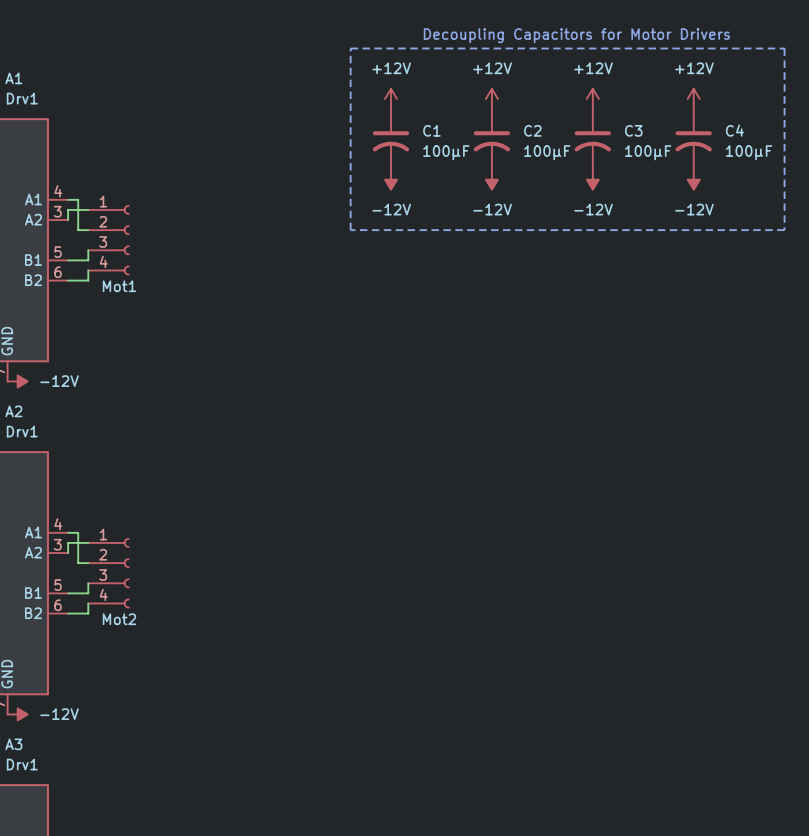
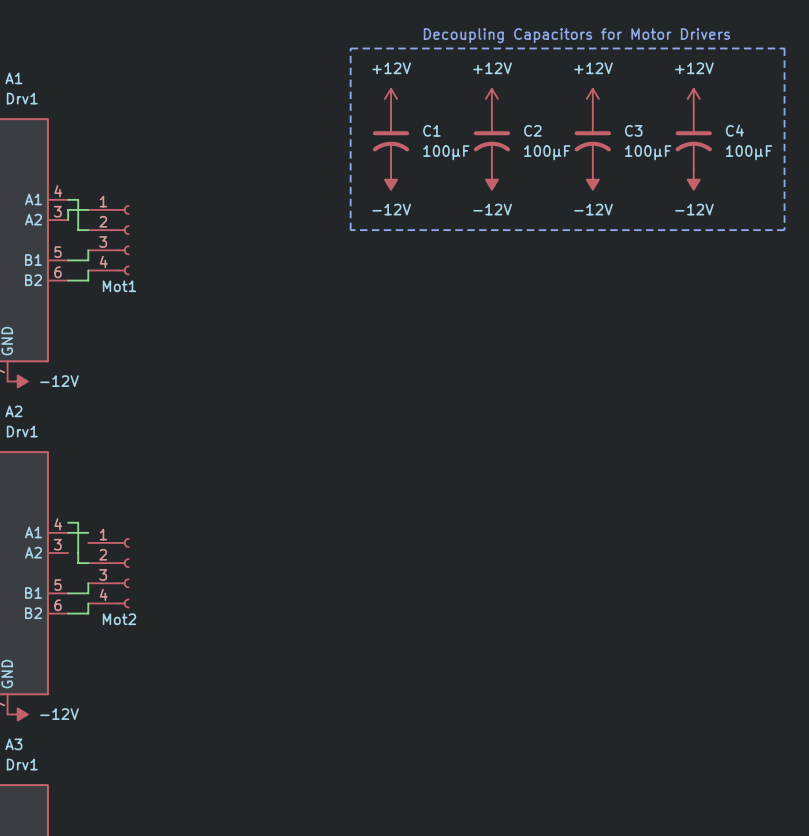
wire: none -> (68, 522) (78, 522) (78, 532) (88, 532)
wire: (88, 542) (68, 542) (68, 553) -> none

